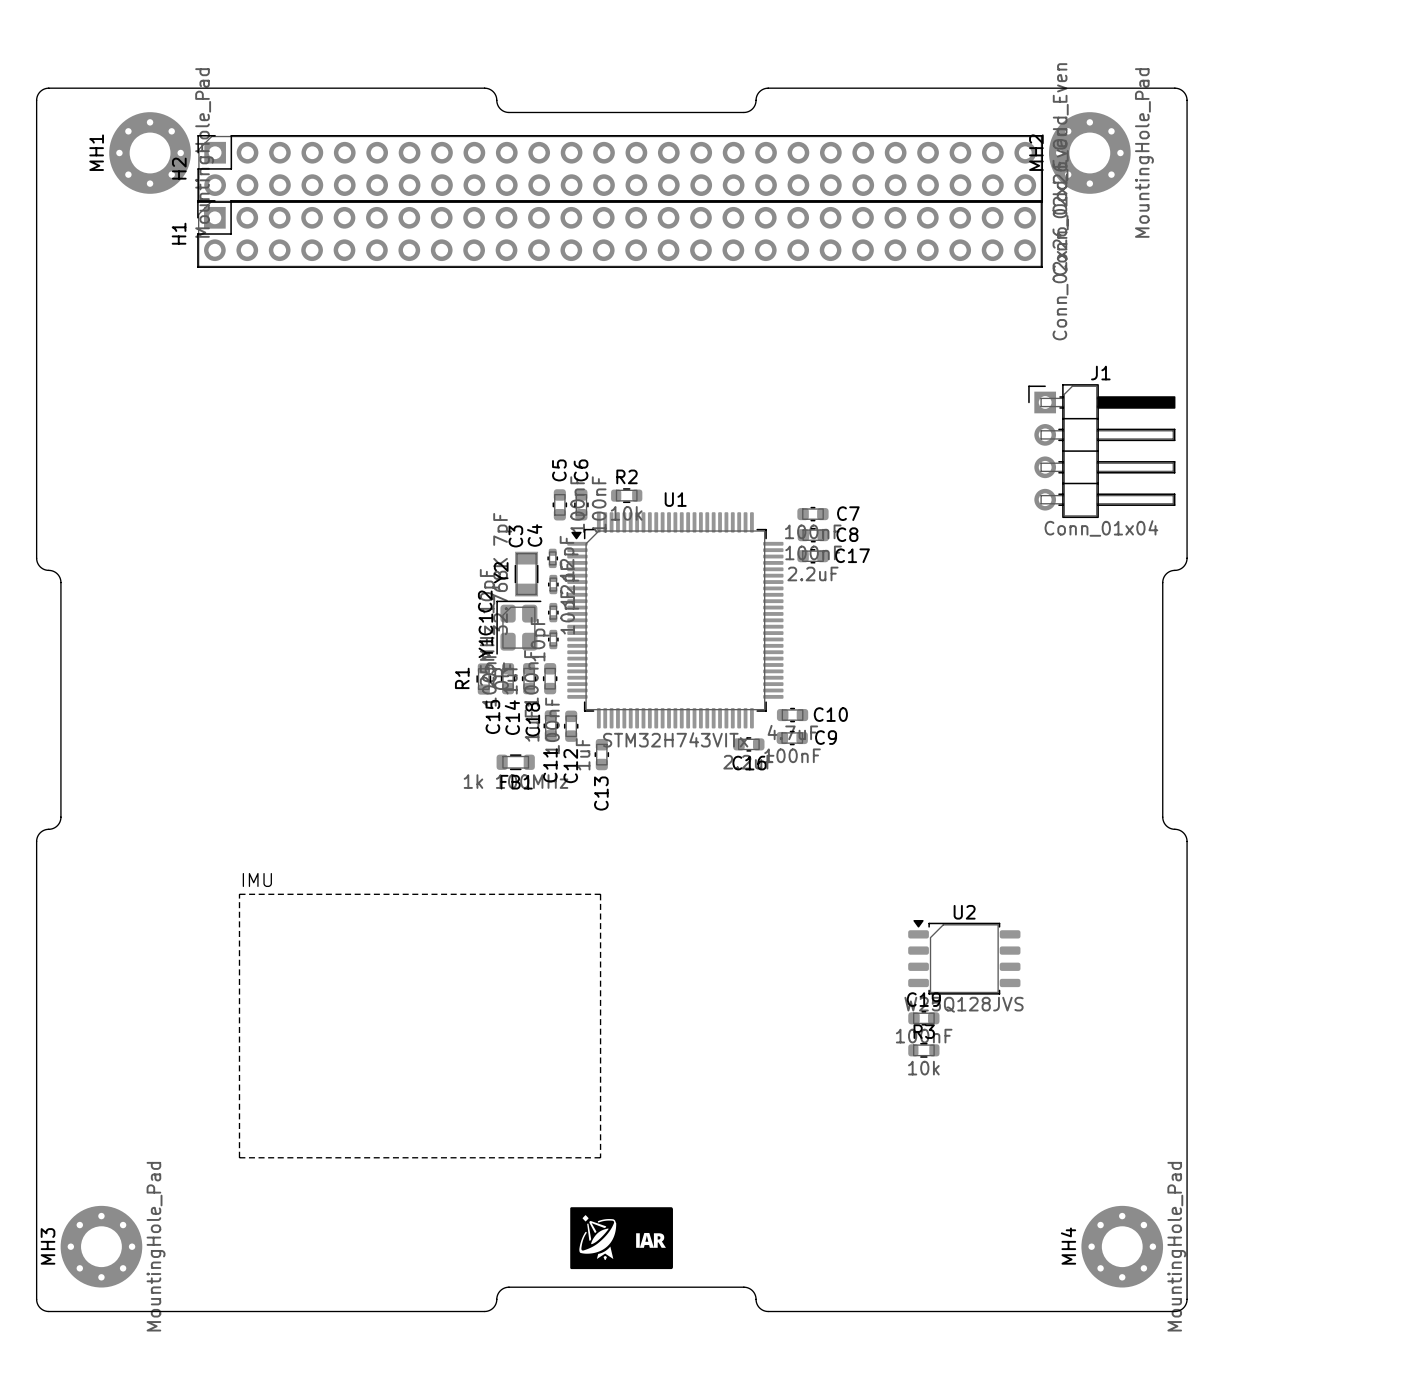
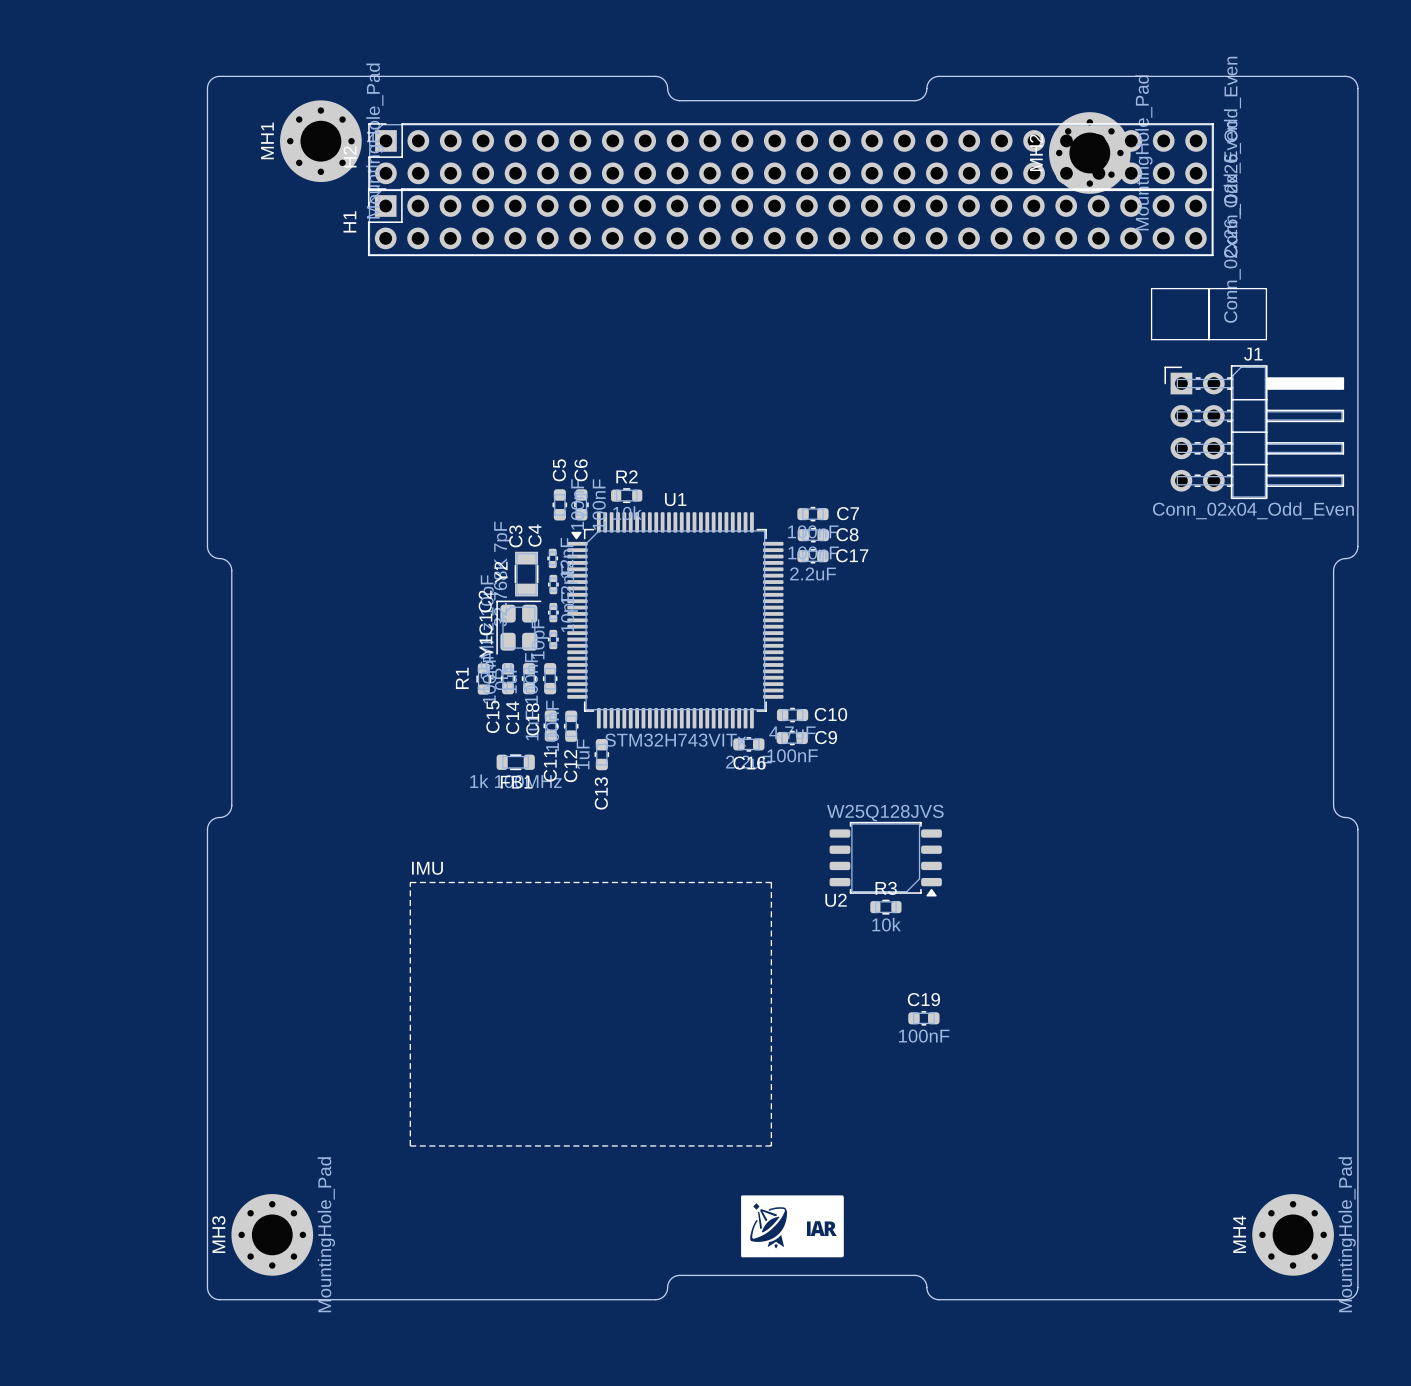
board edge: (48, 88) (484, 88) (493, 91) (499, 107) (508, 112) (745, 112) (753, 107) (759, 91) (768, 88) (1174, 88) (1183, 91) (1187, 100) (1187, 558) (1183, 566) (1167, 572) (1162, 580) (1162, 817) (1167, 826) (1183, 832) (1187, 841) (1187, 1299) (1183, 1307) (1174, 1311) (768, 1311) (759, 1307) (753, 1291) (743, 1287) (507, 1287) (499, 1291) (493, 1307) (484, 1311) (48, 1311) (40, 1307) (36, 1299) (36, 841) (40, 832) (56, 826) (60, 817) (60, 580) (56, 572) (40, 566) (36, 558) (36, 100) (40, 91) (48, 88) -> (219, 76) (655, 76) (664, 79) (670, 95) (679, 100) (916, 100) (924, 95) (930, 79) (939, 76) (1345, 76) (1354, 79) (1357, 88) (1357, 546) (1354, 555) (1338, 561) (1333, 570) (1333, 806) (1338, 814) (1354, 821) (1357, 829) (1357, 1287) (1354, 1296) (1345, 1299) (939, 1299) (929, 1294) (923, 1278) (914, 1275) (678, 1275) (670, 1280) (664, 1296) (655, 1299) (219, 1299) (211, 1296) (207, 1287) (207, 829) (212, 820) (228, 813) (231, 805) (231, 569) (227, 561) (211, 555) (207, 546) (207, 88) (211, 79) (219, 76)
MH1 position: (150, 152) -> (320, 141)
H2 position: (620, 168) -> (791, 157)
H1 position: (619, 234) -> (790, 222)
line: none -> (1151, 288) (1266, 288) (1266, 339) (1151, 339) (1151, 288)
line: none -> (1208, 288) (1208, 339)
J1 footprint: [1028, 384, 1176, 519] -> [1164, 365, 1345, 500]
J1 value: Conn_01x04 (1101, 528) -> Conn_02x04_Odd_Even (1253, 510)
text position: IMU (257, 879) -> IMU (427, 868)
line: (239, 894) (600, 894) (600, 1157) (239, 1157) (239, 894) -> (410, 882) (771, 882) (771, 1145) (410, 1145) (410, 882)
U2 name position: U2 (964, 912) -> U2 (836, 900)
U2 rotation: 0° (964, 957) -> 180° (885, 859)
U2 position: (964, 957) -> (885, 859)
R3 position: (923, 1050) -> (885, 907)
drawing position: (659, 1237) -> (829, 1226)
drawing position: (621, 1238) -> (792, 1226)
drawing position: (646, 1238) -> (817, 1226)
MH3 position: (101, 1246) -> (272, 1234)
MH4 position: (1122, 1246) -> (1293, 1234)

